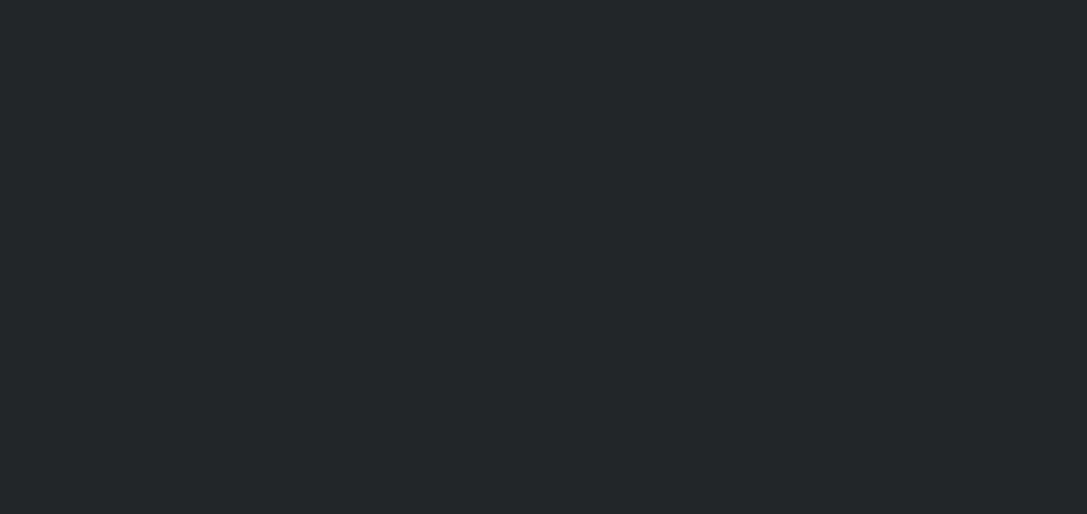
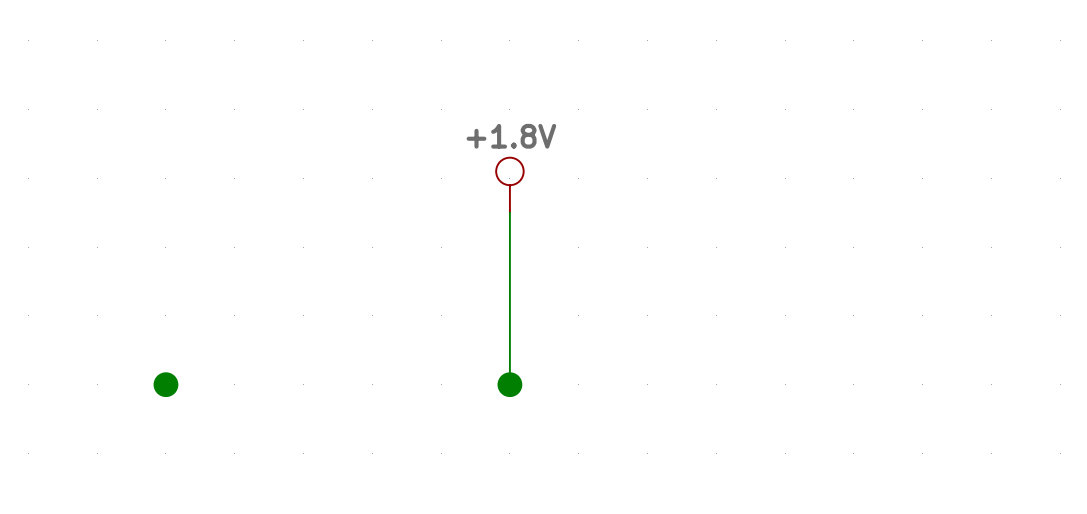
power symbol: none -> +1.8V (509, 185)
wire: none -> (509, 212) (509, 384)
junction: none -> (165, 384)
junction: none -> (509, 384)

